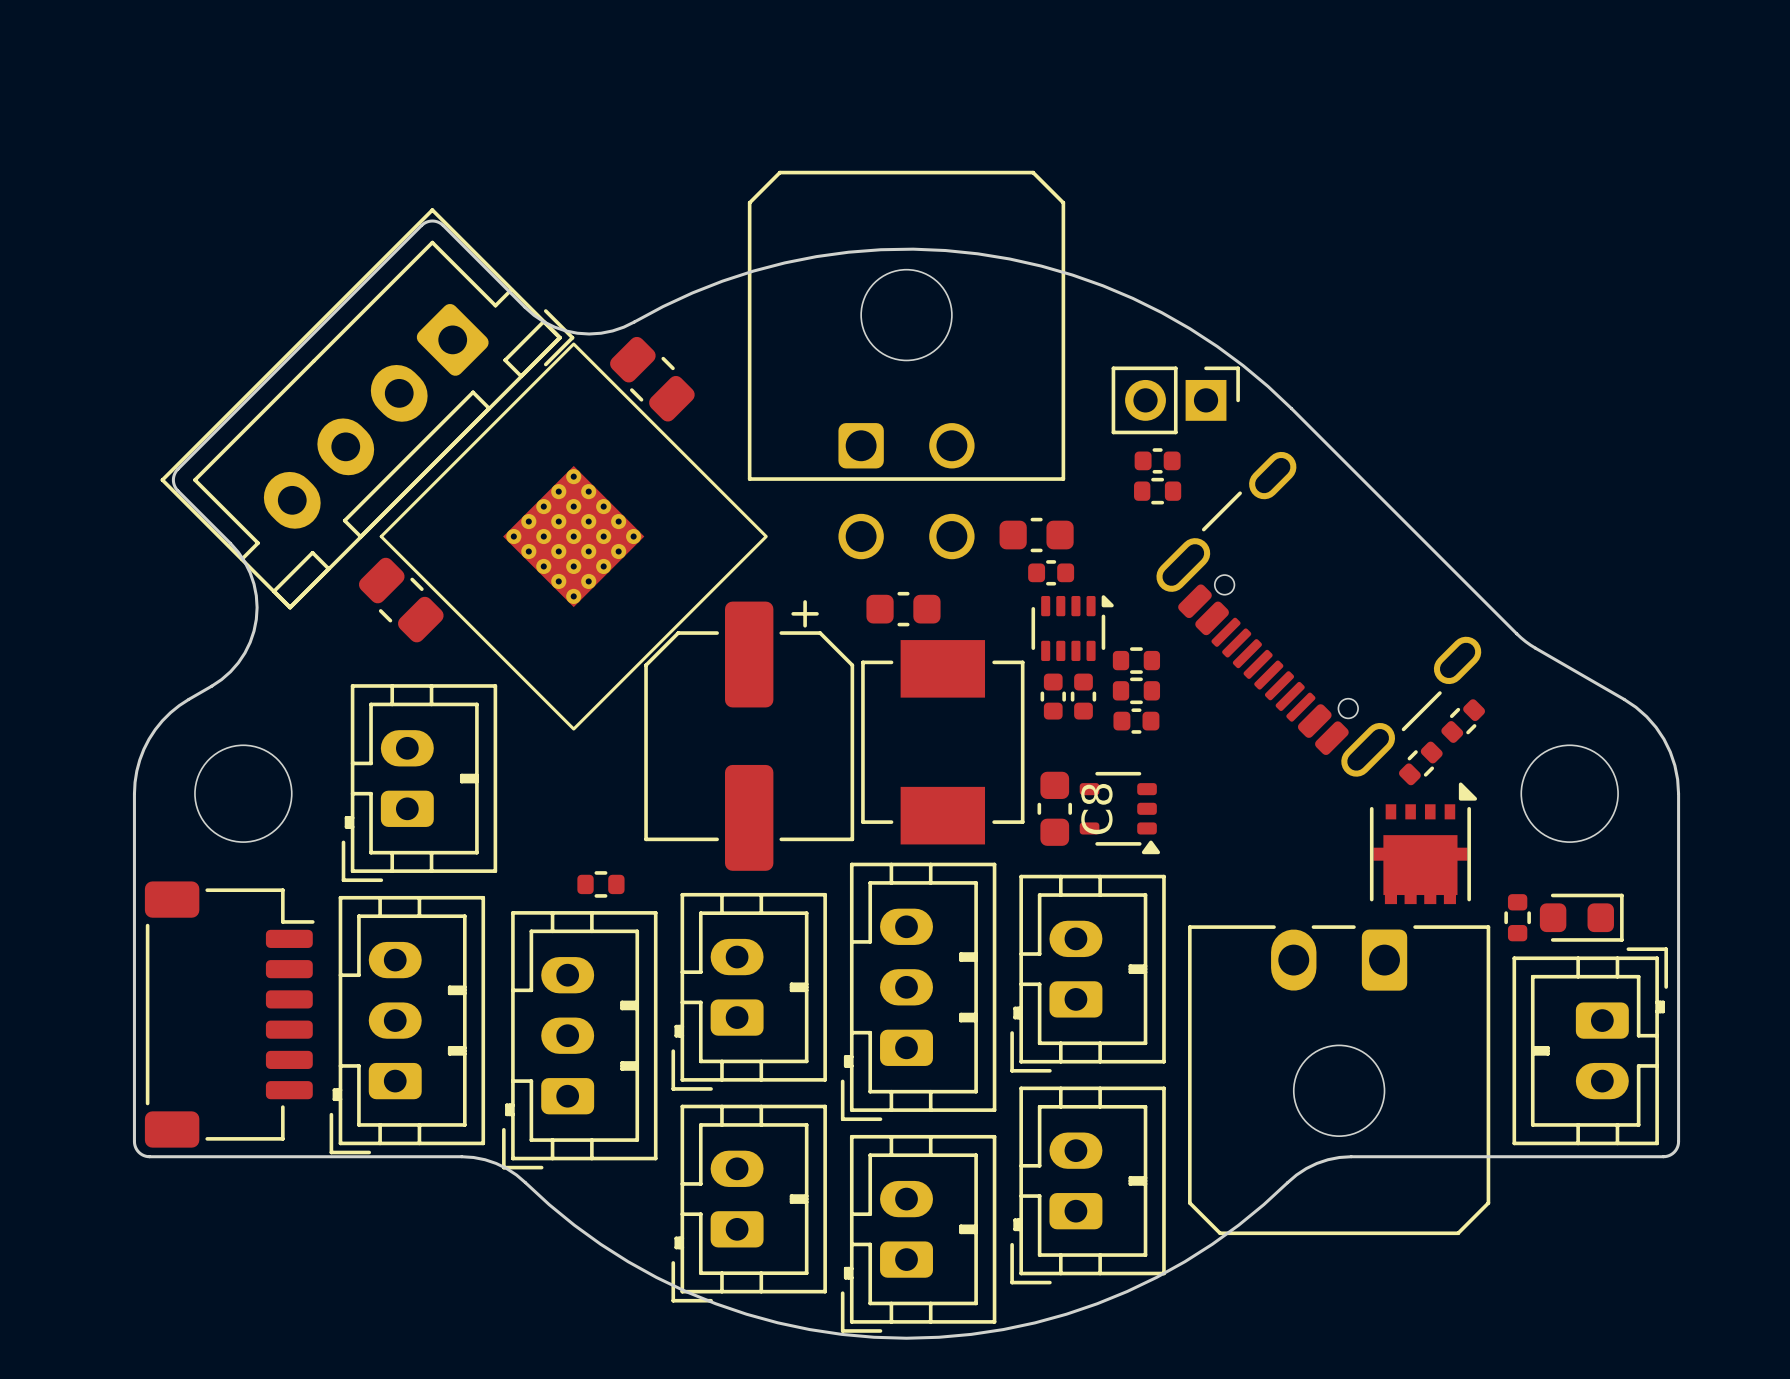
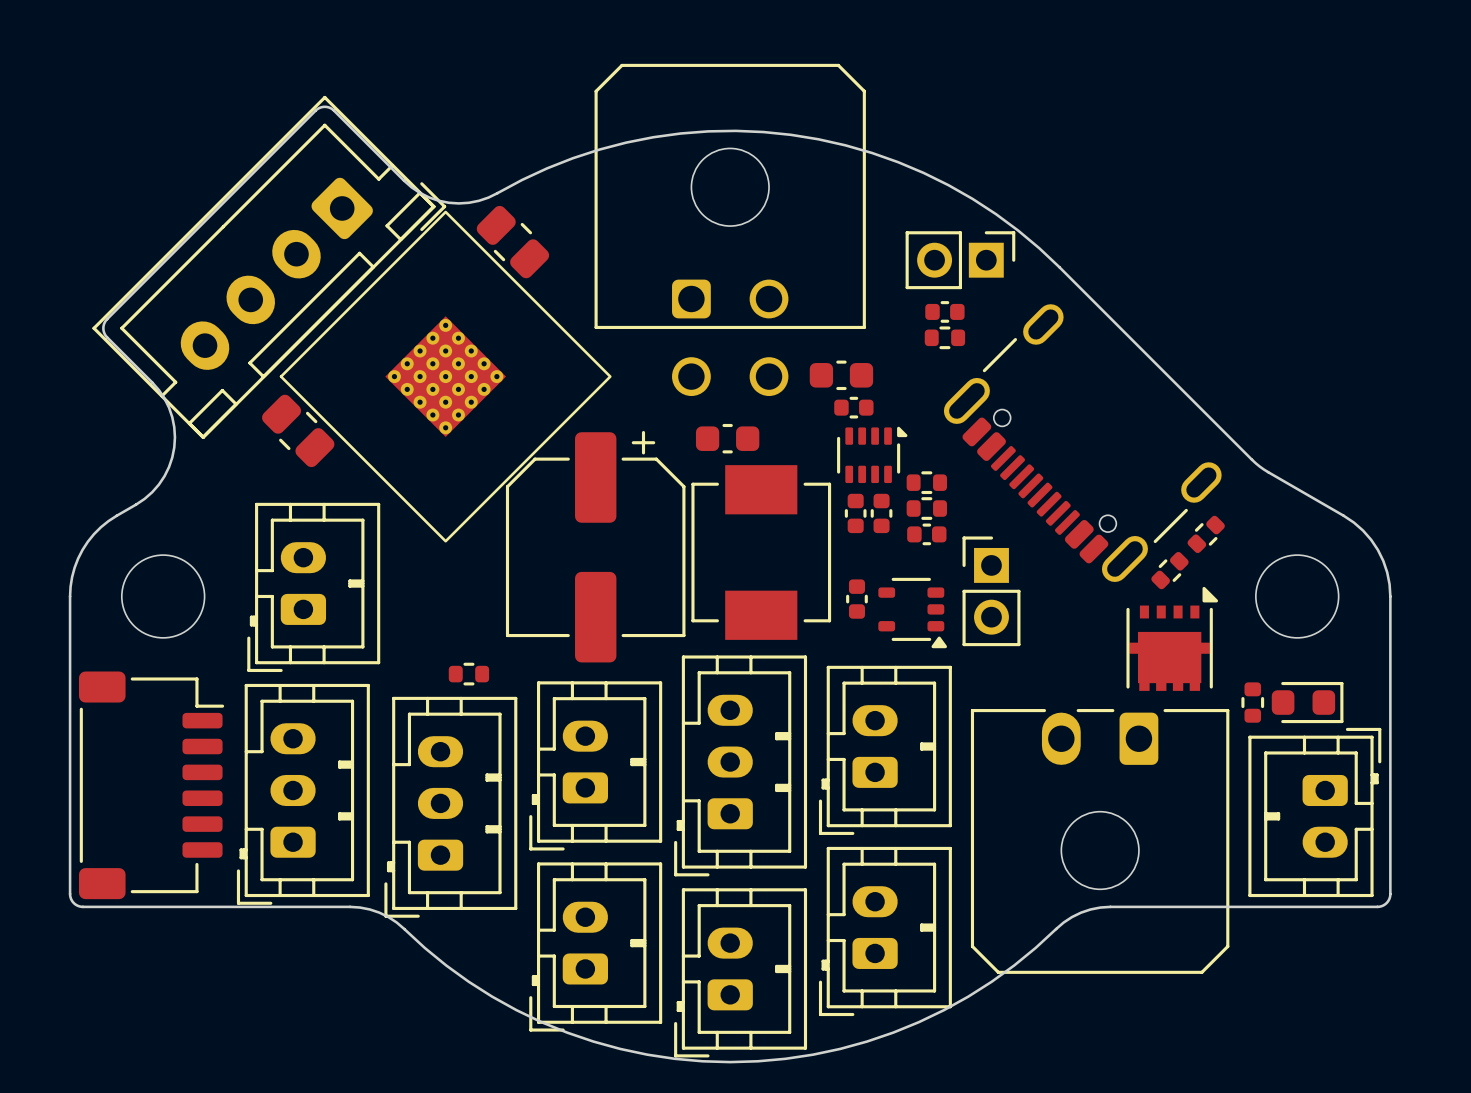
part: none -> (991, 591)
part: none -> (856, 599)
C8: (1054, 808) -> none

